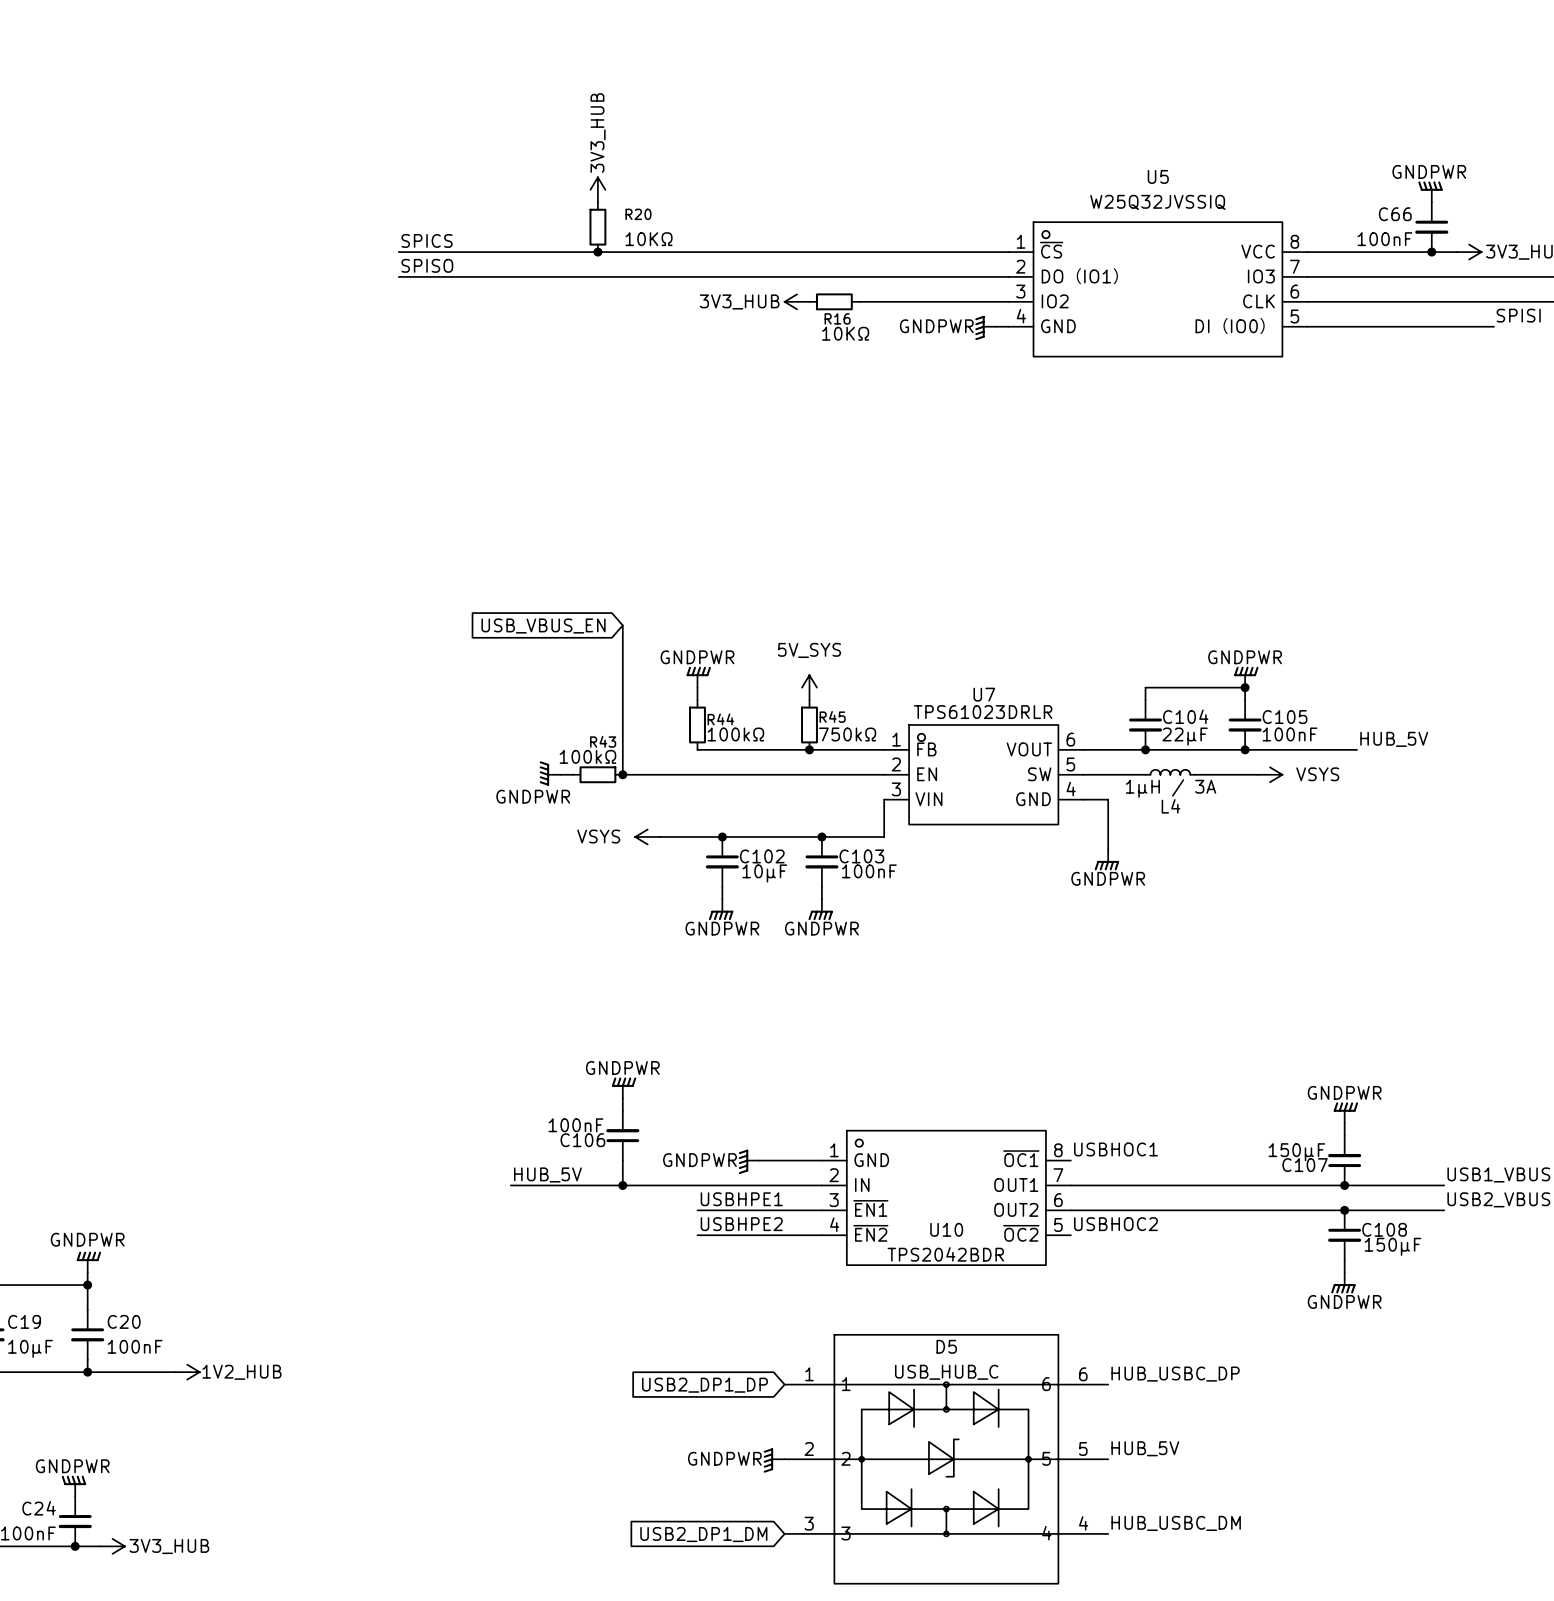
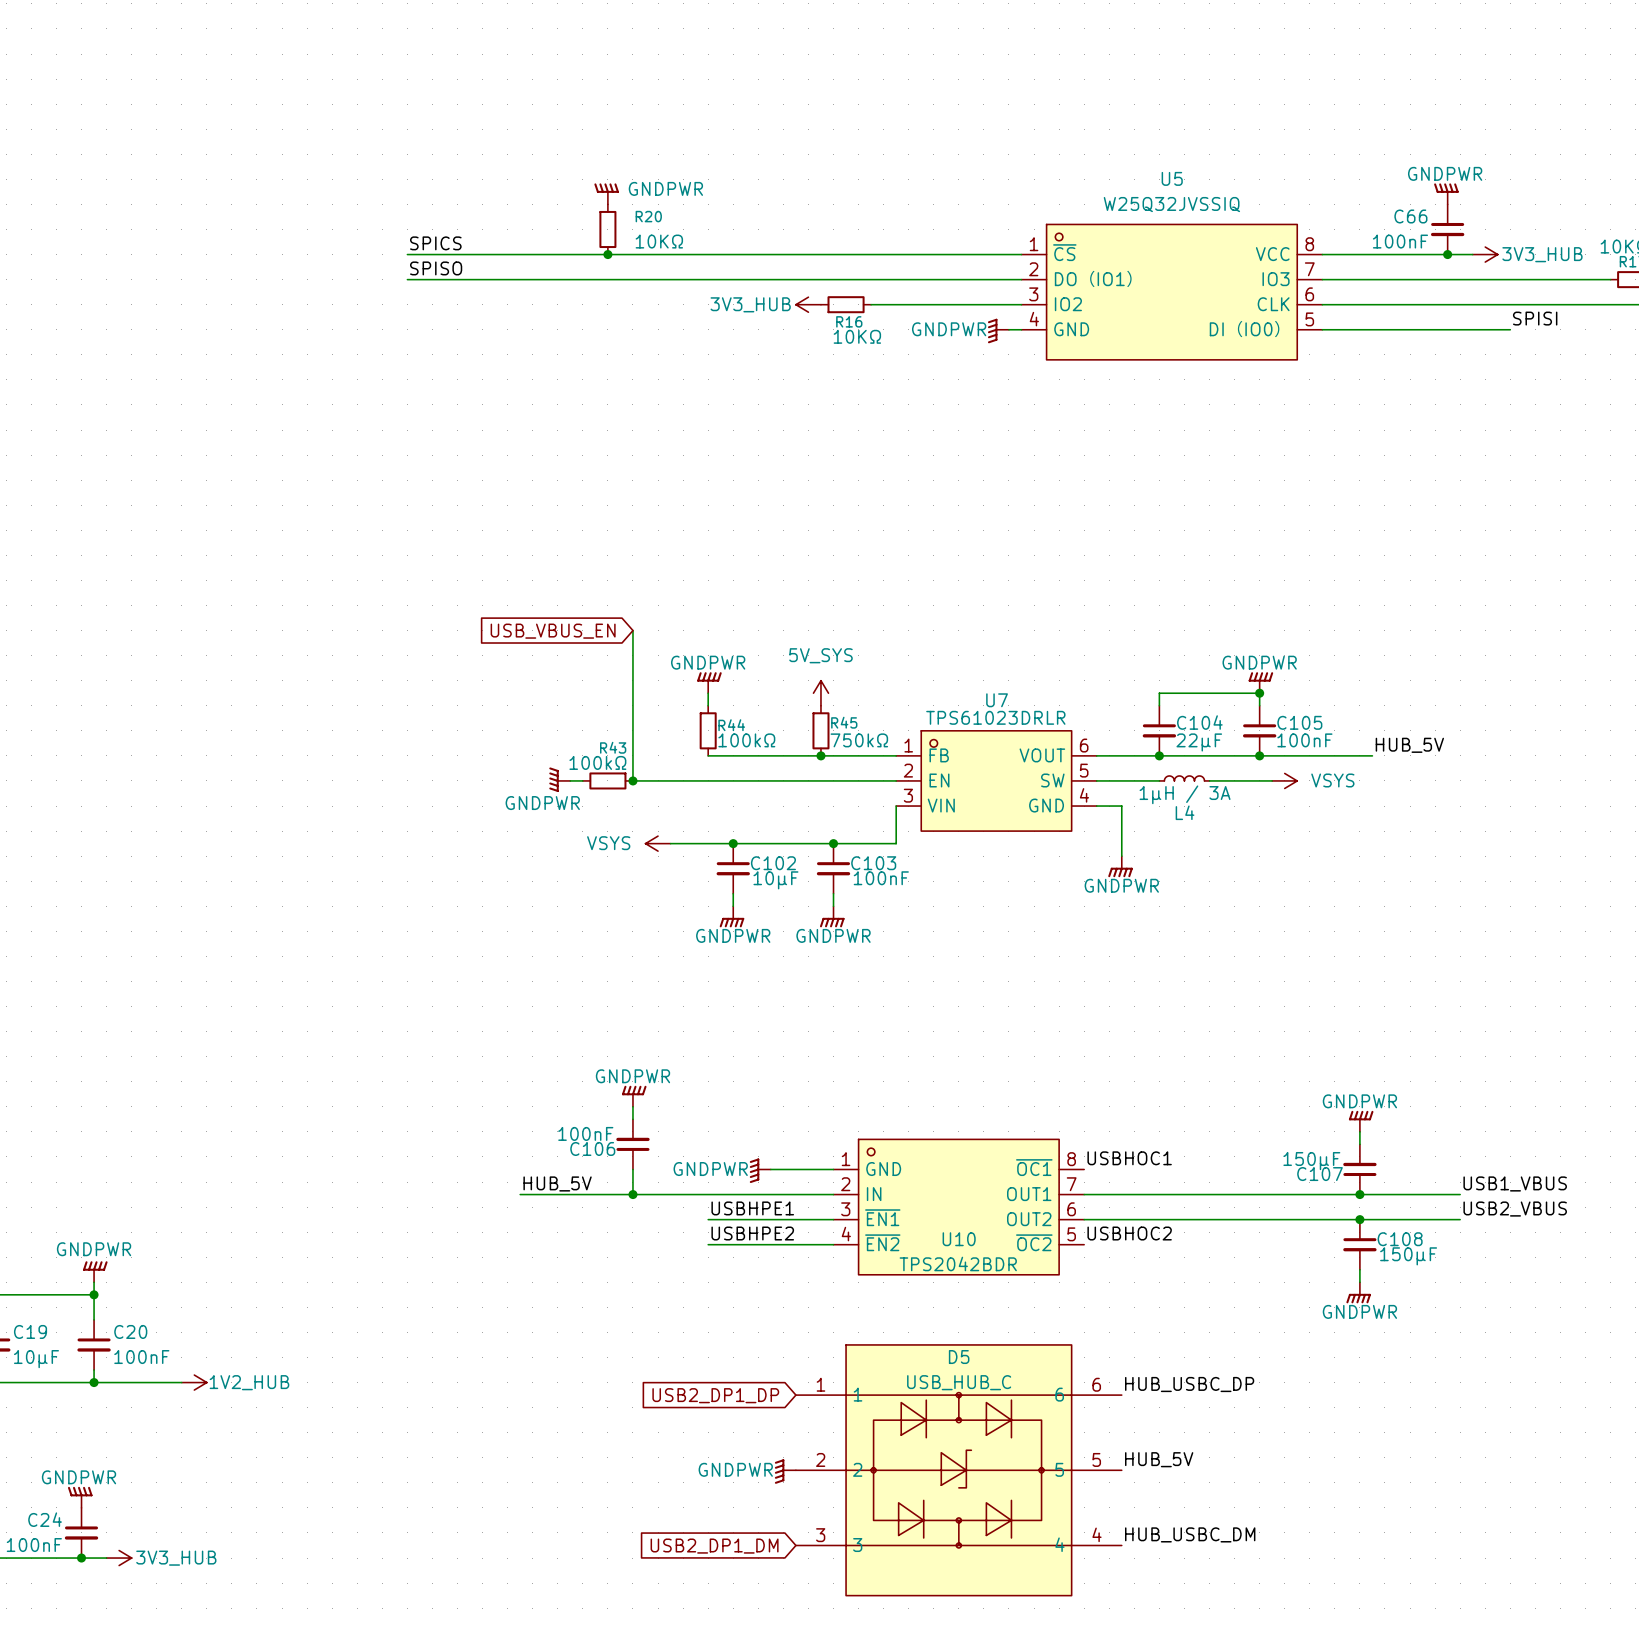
power symbol: 3V3_HUB (597, 189) -> GNDPWR (606, 193)

